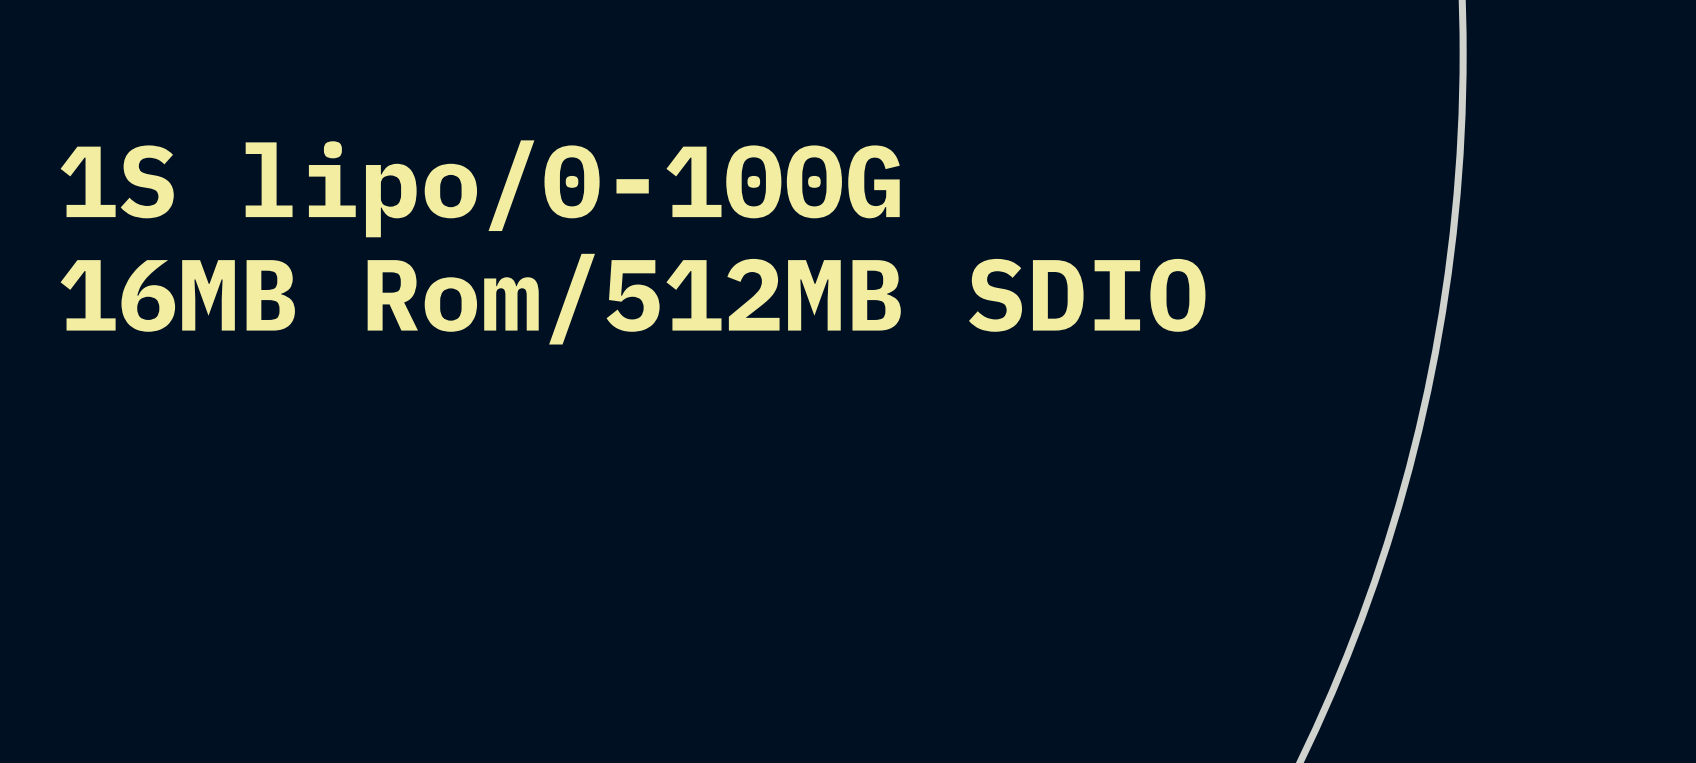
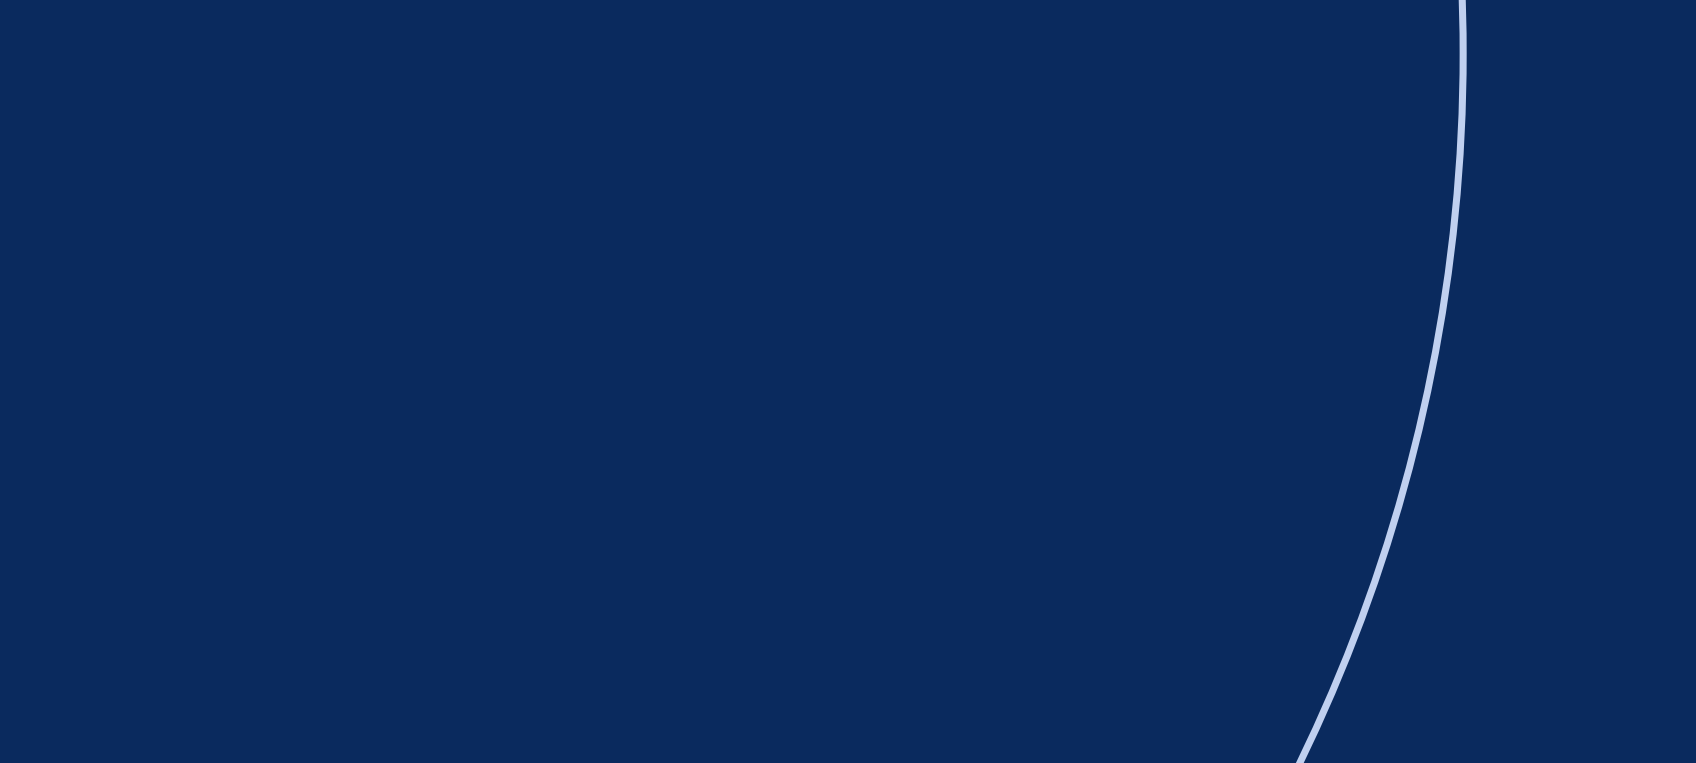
text: 1S lipo/0-100G (480, 188) -> none
text: 16MB Rom/512MB SDIO (633, 299) -> none

